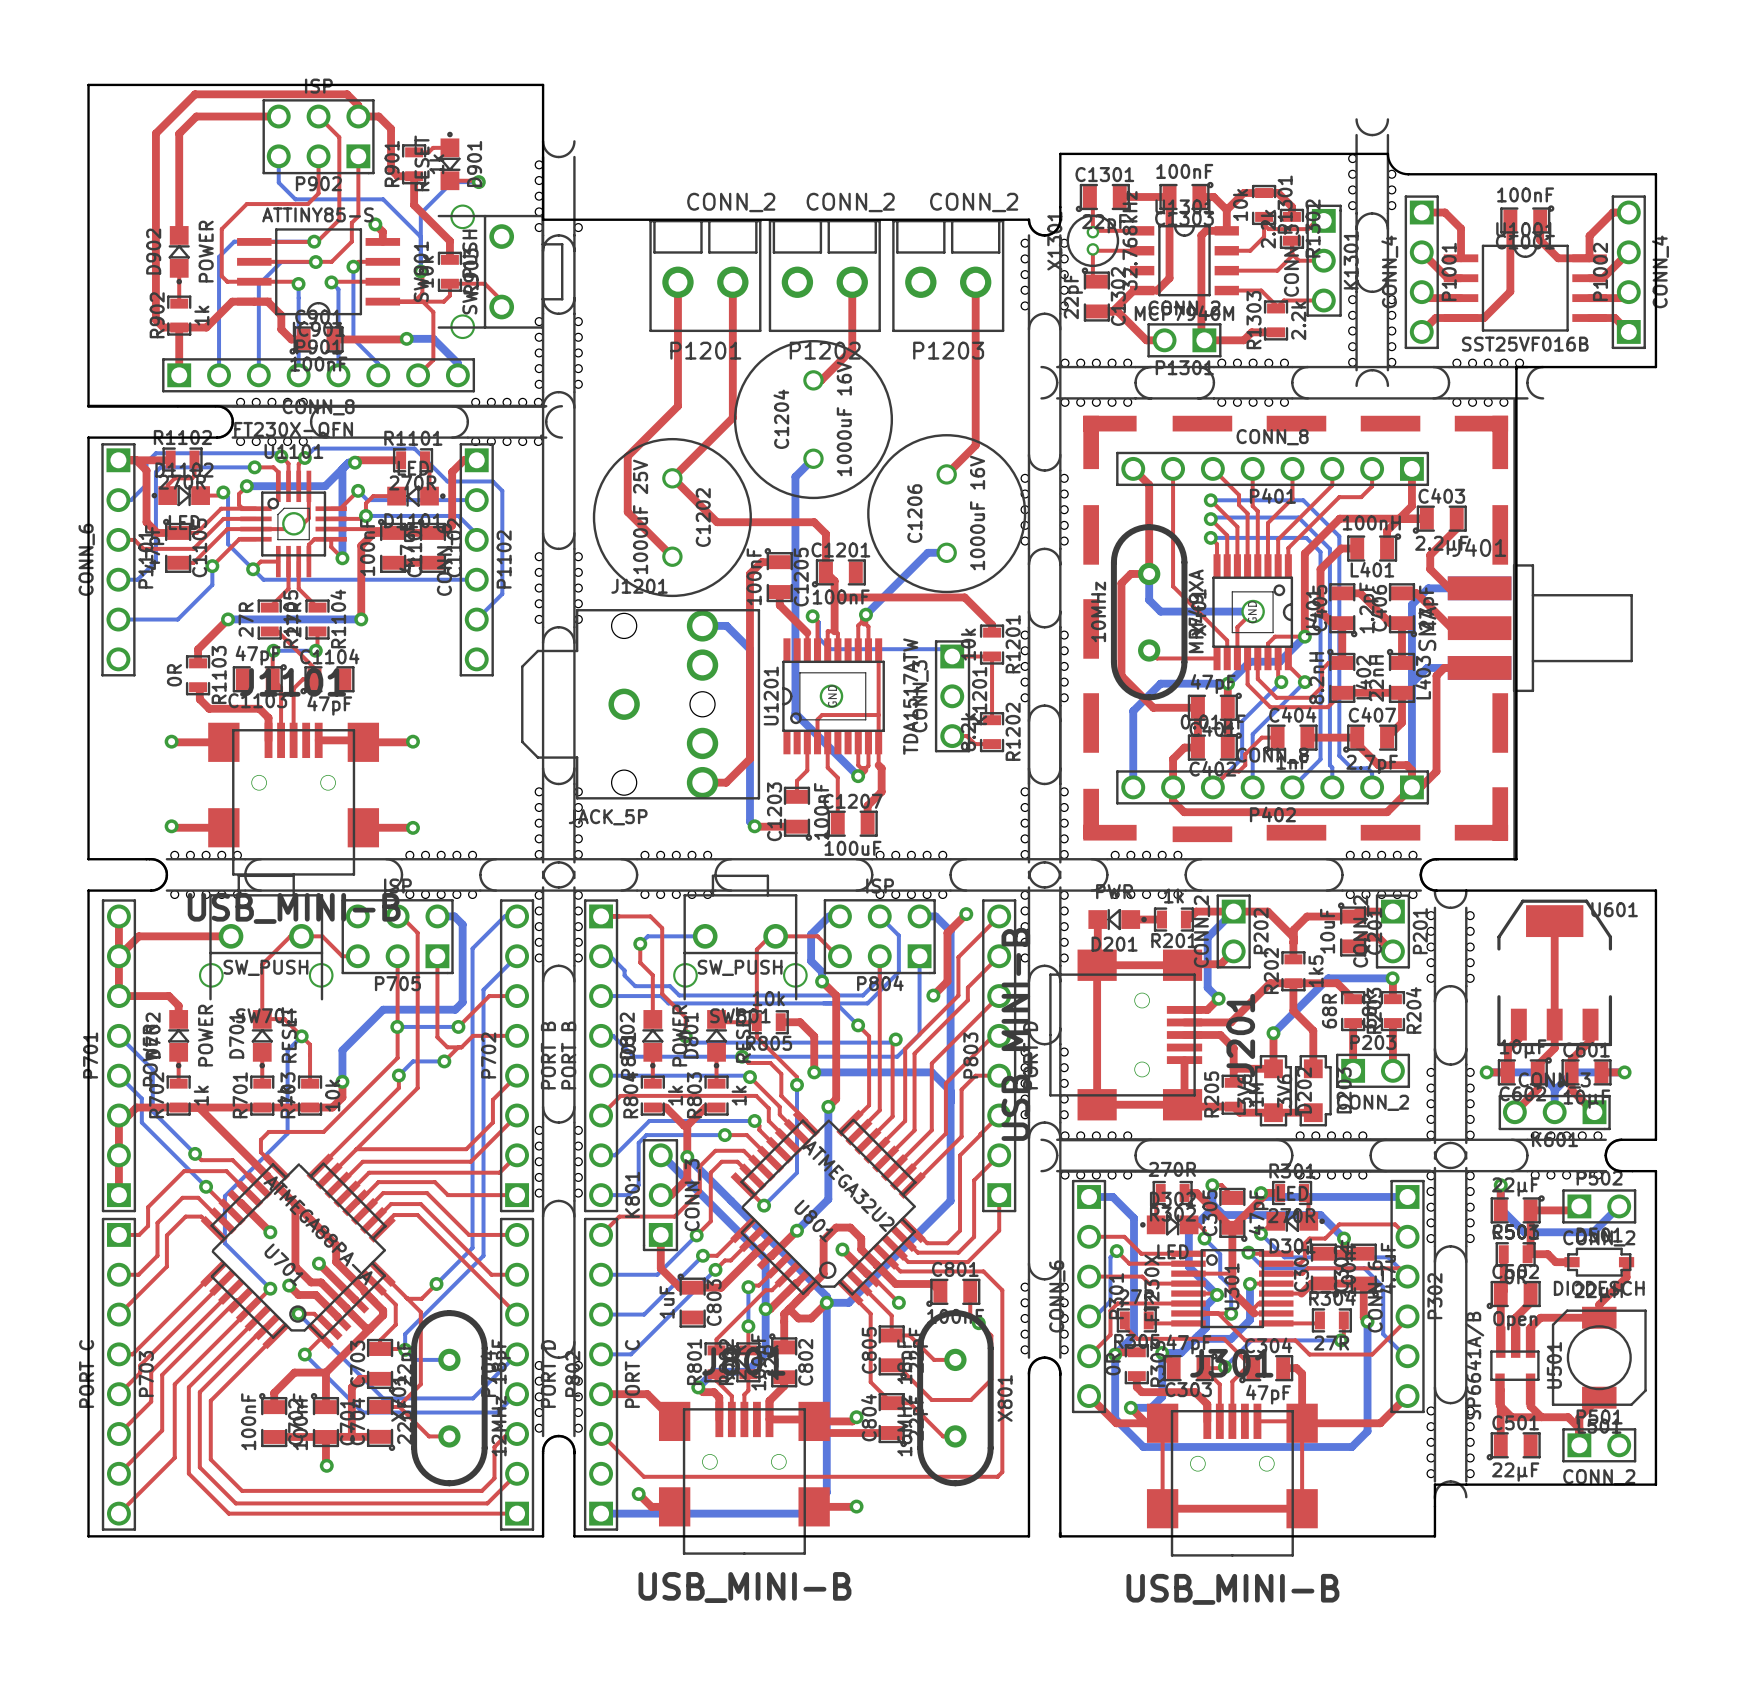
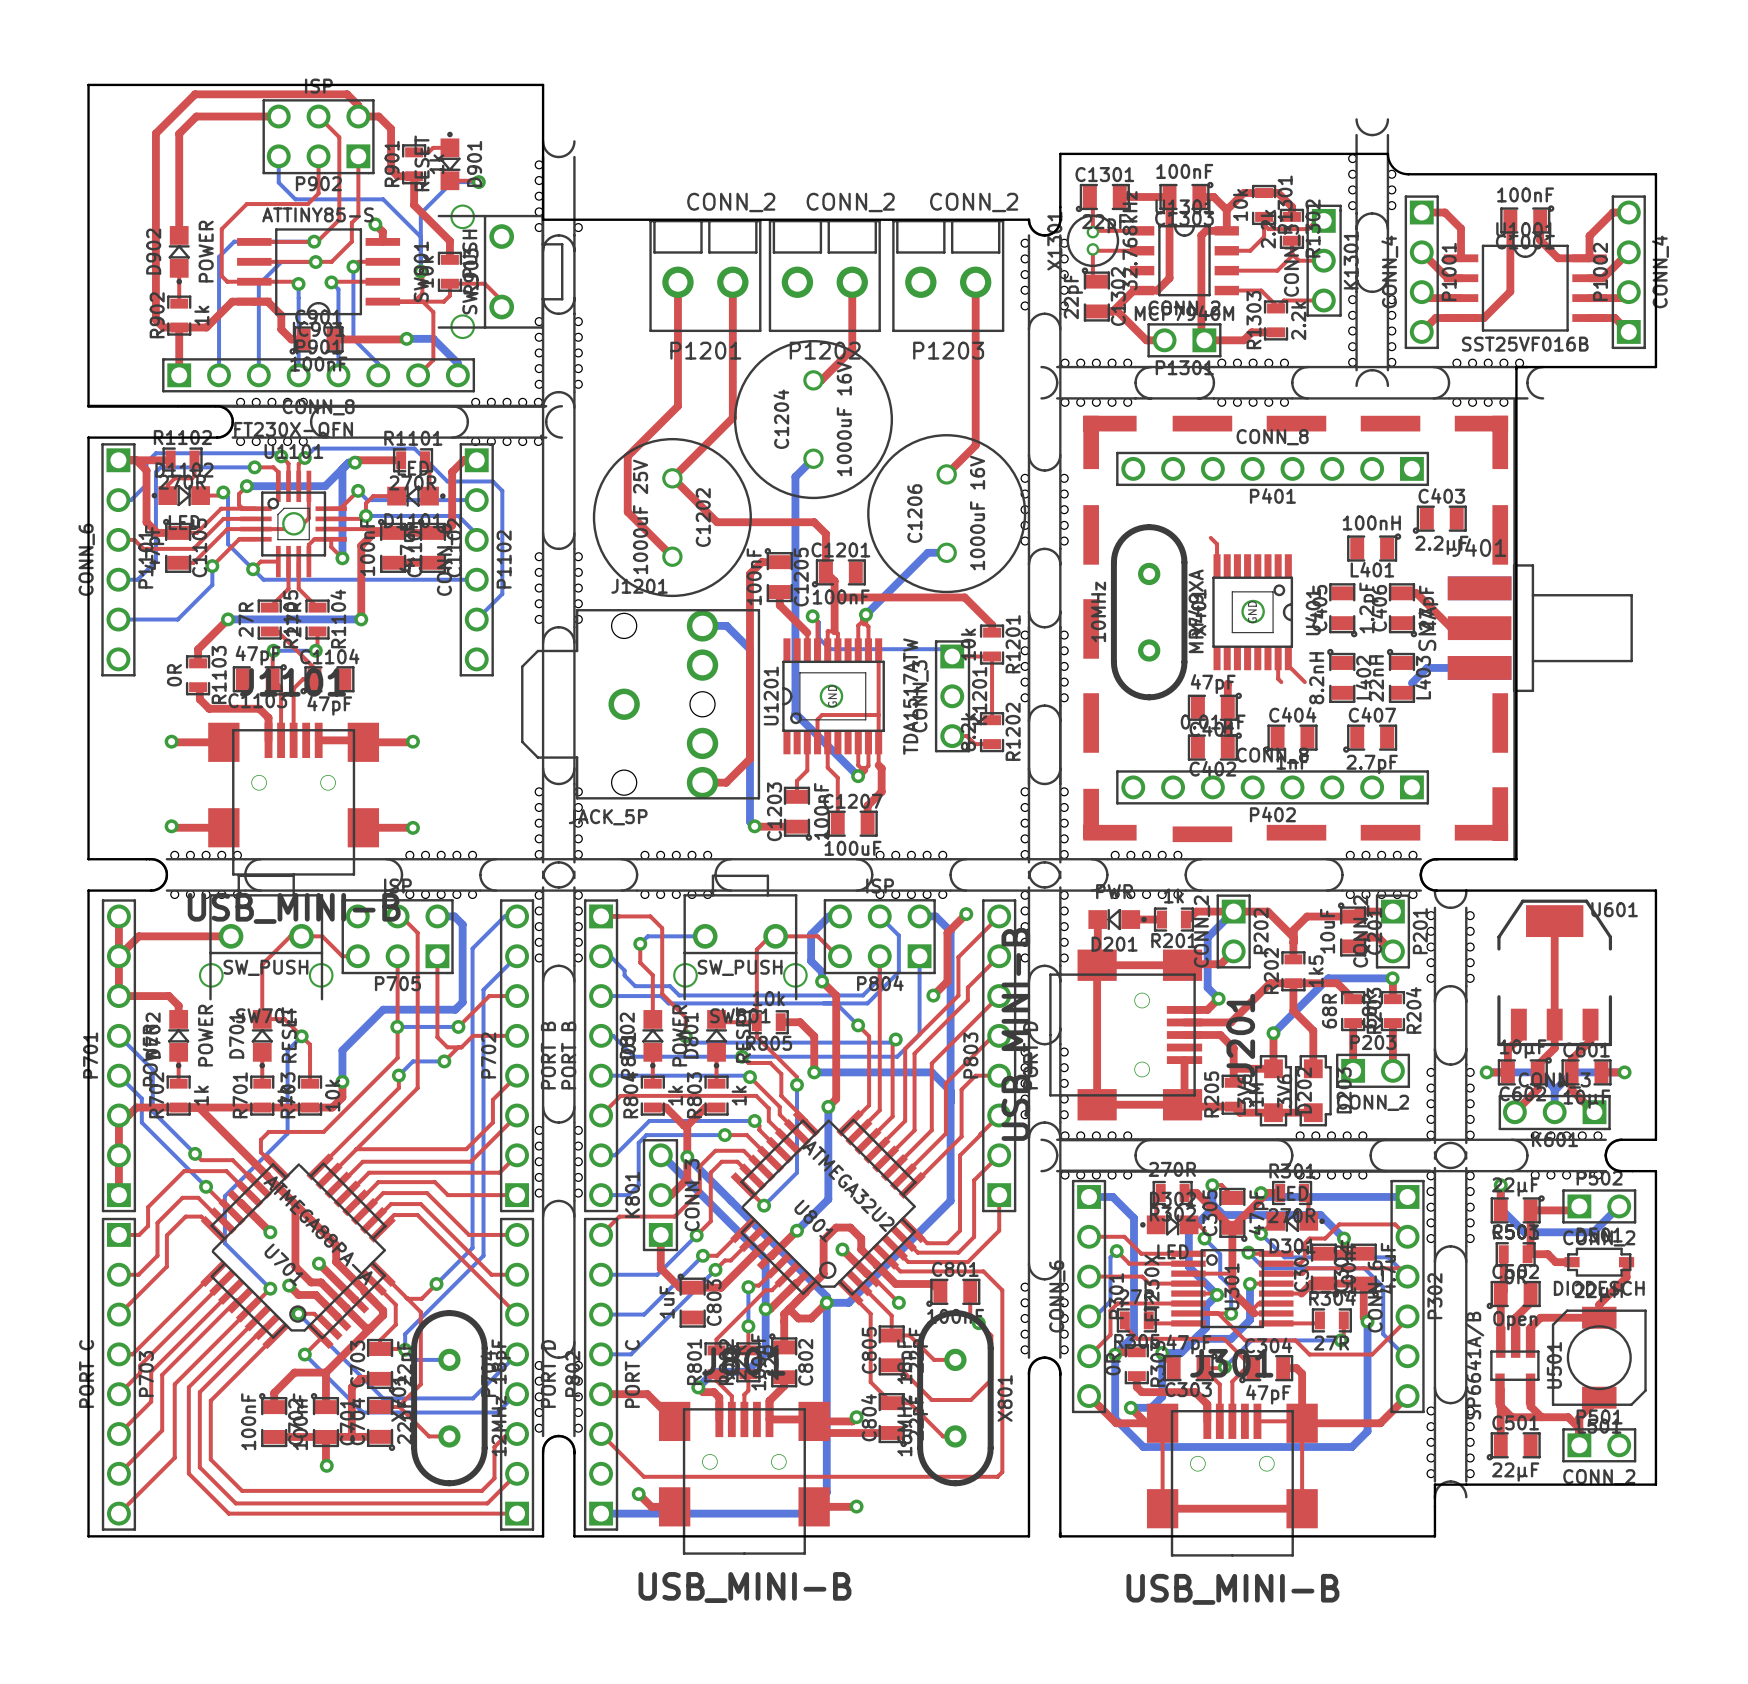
top track: (1133, 468) (1149, 484) (1149, 573) (1130, 573) (1121, 583) (1121, 675) (1153, 707) (1197, 707) (1197, 747) (1184, 747) (1173, 759) (1173, 801) (1184, 812) (1387, 812) (1411, 787) -> none
top track: (1173, 468) (1173, 586) (1227, 640) (1227, 658) -> none
top track: (1212, 468) (1239, 495) (1239, 504) (1247, 513) (1247, 565) -> none
top track: (1252, 468) (1252, 506) (1257, 511) (1257, 565) -> none
top track: (1292, 468) (1292, 498) (1267, 523) (1267, 565) -> none
top track: (1332, 468) (1332, 485) (1278, 539) (1278, 565) -> none
top track: (1372, 468) (1372, 486) (1361, 497) (1339, 497) (1288, 548) (1288, 565) -> none
top track: (1411, 468) (1411, 506) (1387, 530) (1387, 548) -> none
top track: (1210, 500) (1237, 526) (1237, 565) -> none
bottom track: (1210, 500) (1303, 500) (1339, 536) (1339, 755) (1351, 768) (1367, 768) (1372, 772) (1372, 787) -> none
via: (1210, 500) -> none
top track: (1426, 518) (1339, 518) (1304, 553) (1304, 636) (1275, 636) (1267, 643) (1267, 658) -> none
top track: (1456, 518) (1456, 528) (1430, 555) (1430, 569) (1449, 588) (1479, 588) -> none
top track: (1210, 519) (1227, 535) (1227, 565) -> none
bottom track: (1210, 519) (1212, 517) (1298, 517) (1329, 548) (1329, 765) (1332, 767) (1332, 787) -> none
via: (1210, 519) -> none
bottom track: (1210, 537) (1306, 537) (1320, 552) (1320, 759) (1292, 787) -> none
via: (1210, 537) -> none
top track: (1357, 548) (1341, 548) (1320, 569) (1320, 611) (1332, 623) (1342, 623) (1342, 662) (1328, 662) (1322, 669) (1322, 686) (1311, 697) (1276, 697) (1257, 678) (1257, 658) -> none
bottom track: (1149, 573) (1149, 600) (1160, 611) (1253, 611) -> none
bottom track: (1479, 588) (1428, 588) (1411, 604) (1411, 787) -> none
top track: (1342, 593) (1360, 593) (1390, 623) (1401, 623) (1401, 662) -> none
top track: (1253, 611) (1237, 627) (1237, 658) -> none
bottom track: (1304, 636) (1279, 661) (1249, 661) (1228, 683) (1160, 683) (1133, 711) (1133, 787) -> none
via: (1304, 636) -> none
top track: (1149, 650) (1157, 658) (1217, 658) -> none
top track: (1247, 658) (1247, 684) (1270, 707) (1327, 707) (1342, 692) (1401, 692) (1401, 722) (1387, 737) -> none
top track: (1479, 667) (1444, 667) (1436, 675) (1436, 771) (1420, 787) (1411, 787) -> none
bottom track: (1281, 682) (1242, 721) (1242, 758) (1212, 787) -> none
via: (1281, 682) -> none
bottom track: (1304, 682) (1252, 734) (1252, 787) -> none
via: (1304, 682) -> none
via: (1228, 683) -> none
top track: (1277, 737) (1261, 737) (1245, 754) (1245, 765) (1239, 771) (1228, 771) (1212, 787) -> none
top track: (1307, 737) (1357, 737) (1357, 743) (1378, 765) (1406, 765) (1411, 770) (1411, 787) -> none

